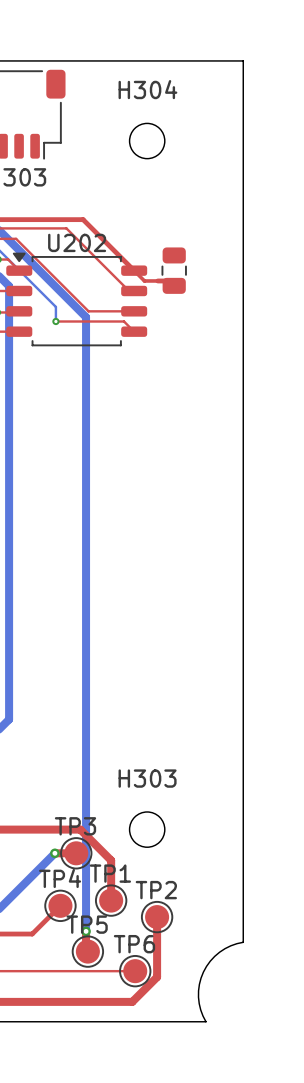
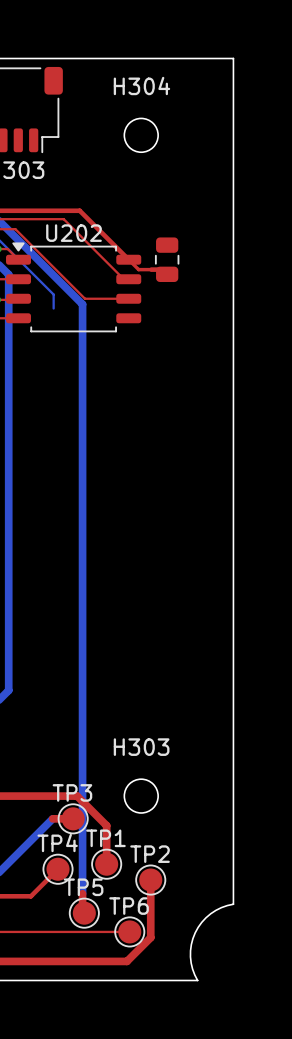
top track: (55, 321) (124, 321) (134, 331) -> none
via: (55, 321) -> none
via: (54, 853) -> none
via: (86, 931) -> none

